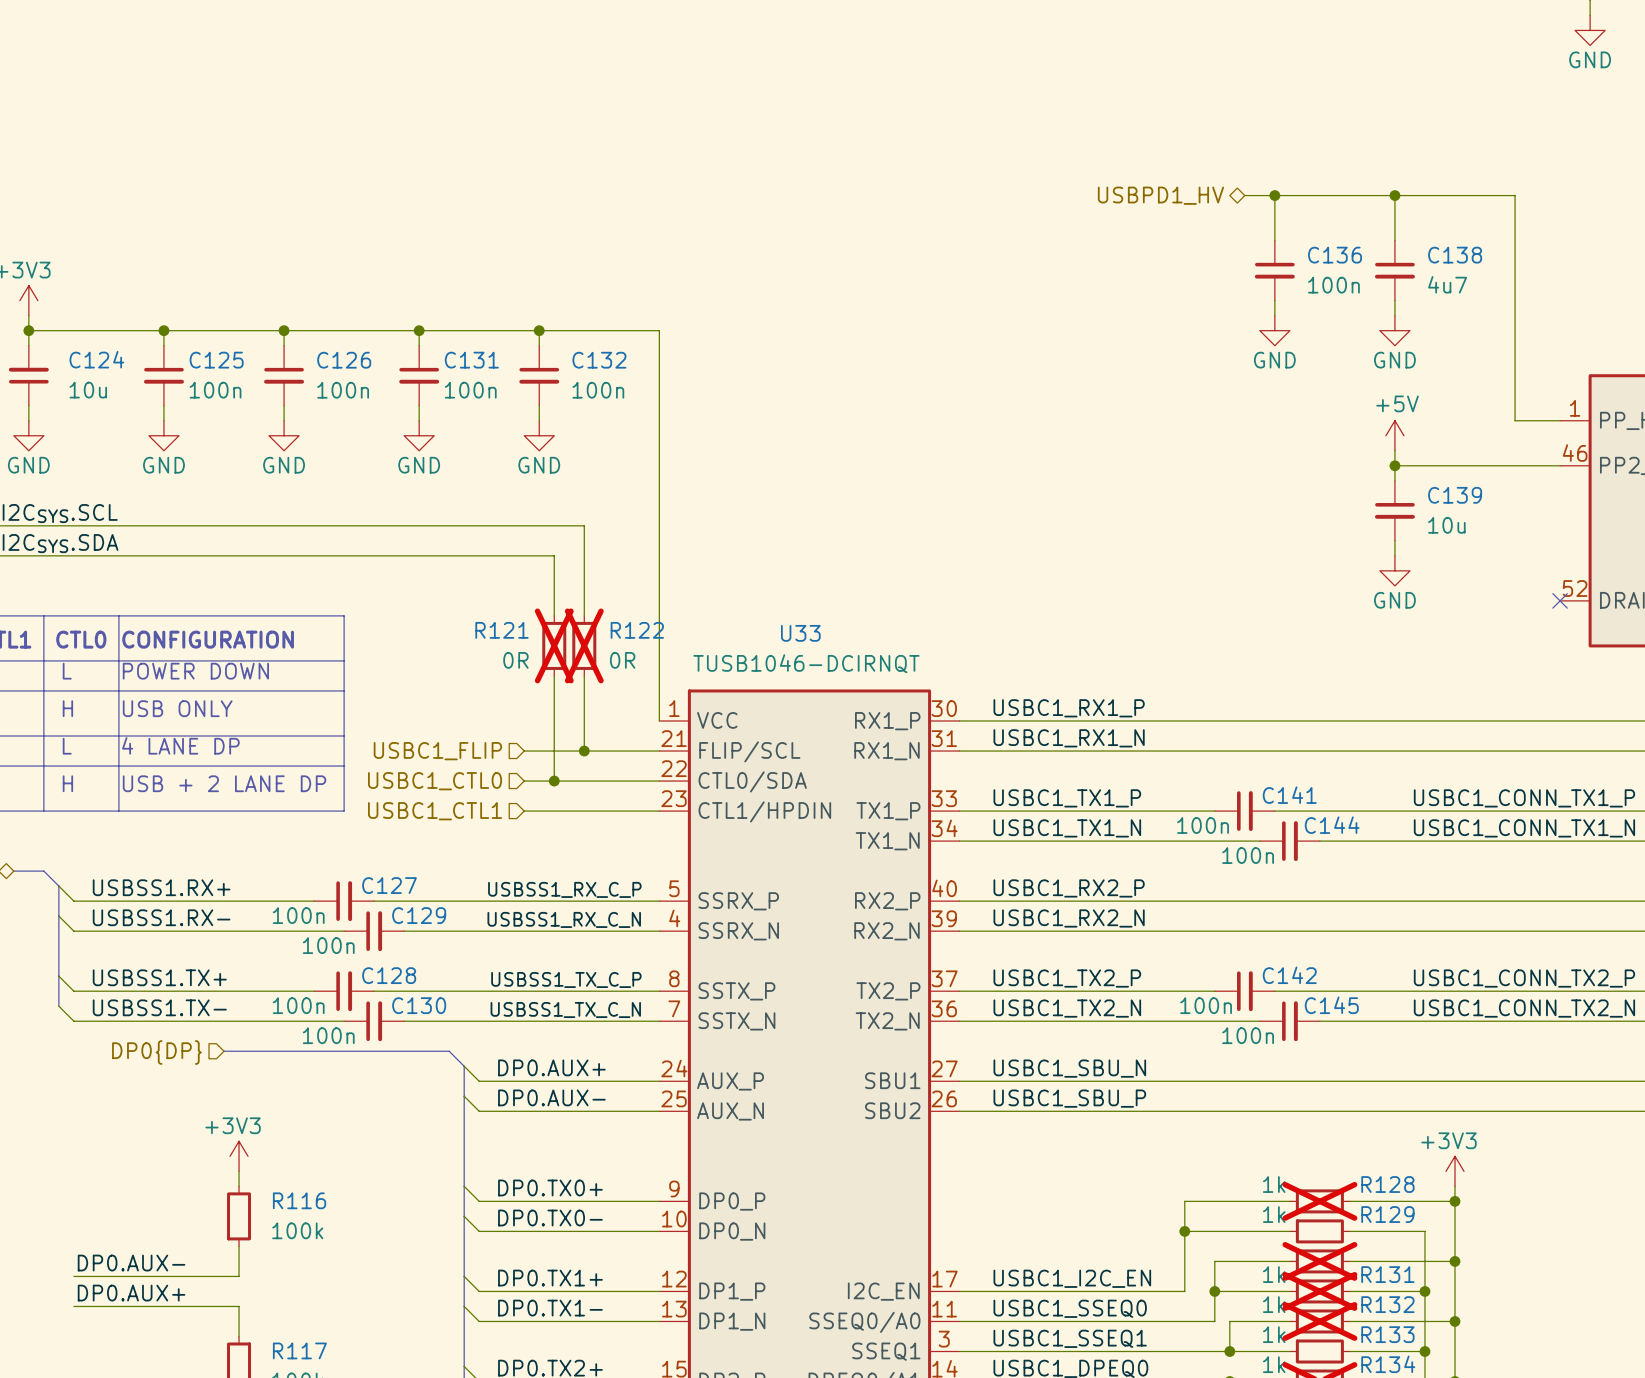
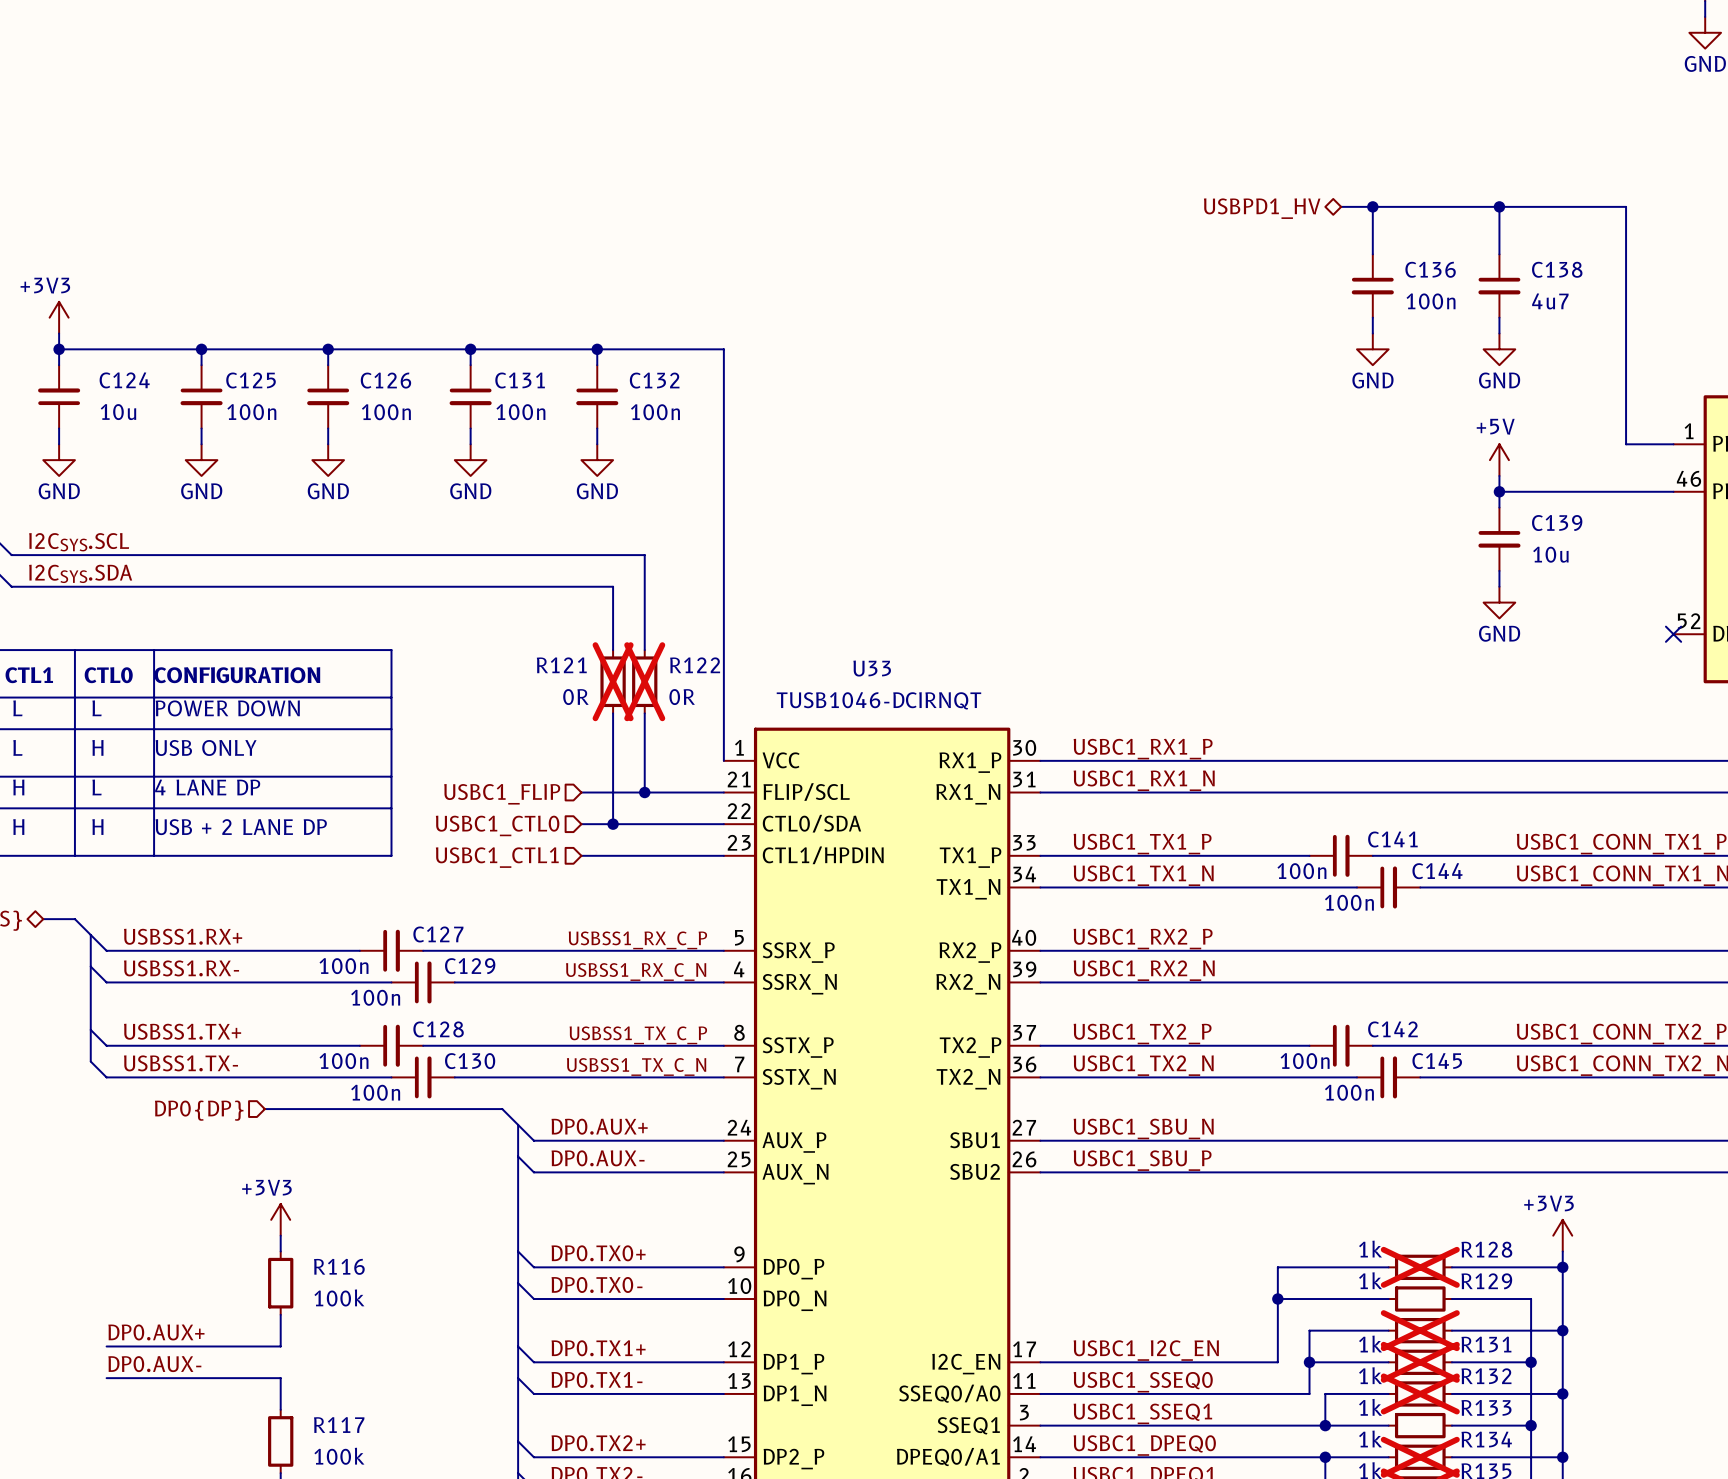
label: DP0.AUX- (131, 1263) -> DP0.AUX+ (156, 1332)
label: DP0.AUX+ (131, 1293) -> DP0.AUX- (154, 1364)

